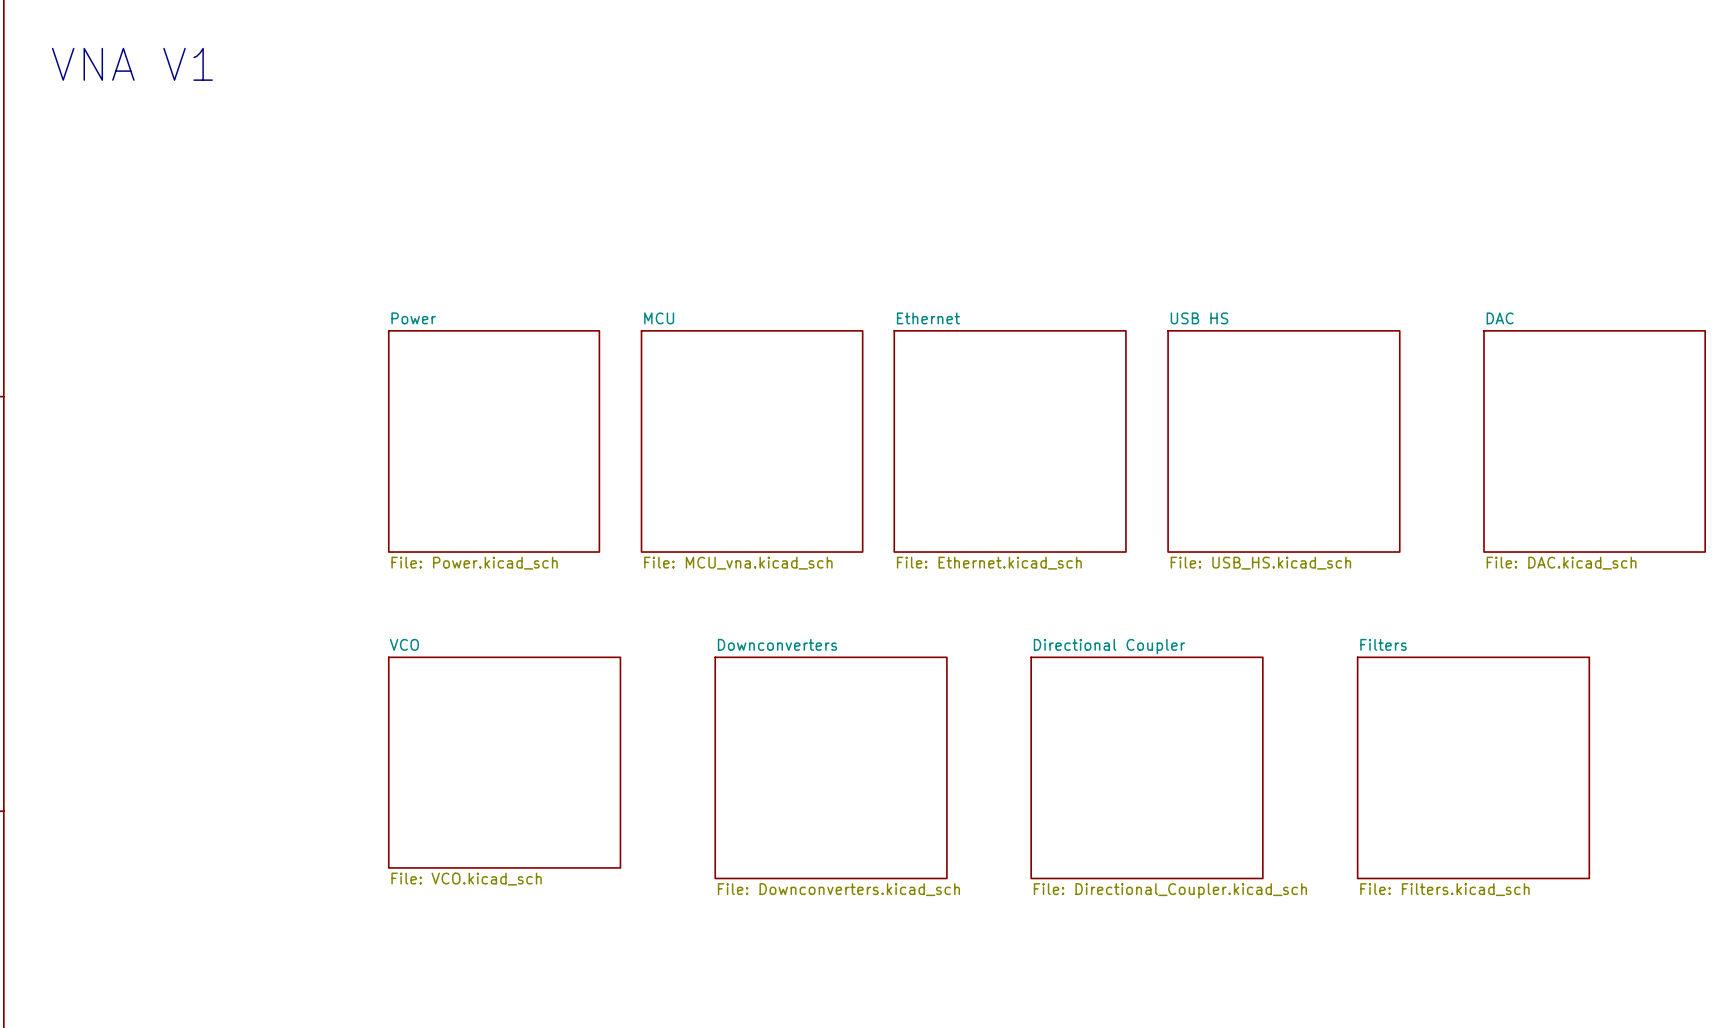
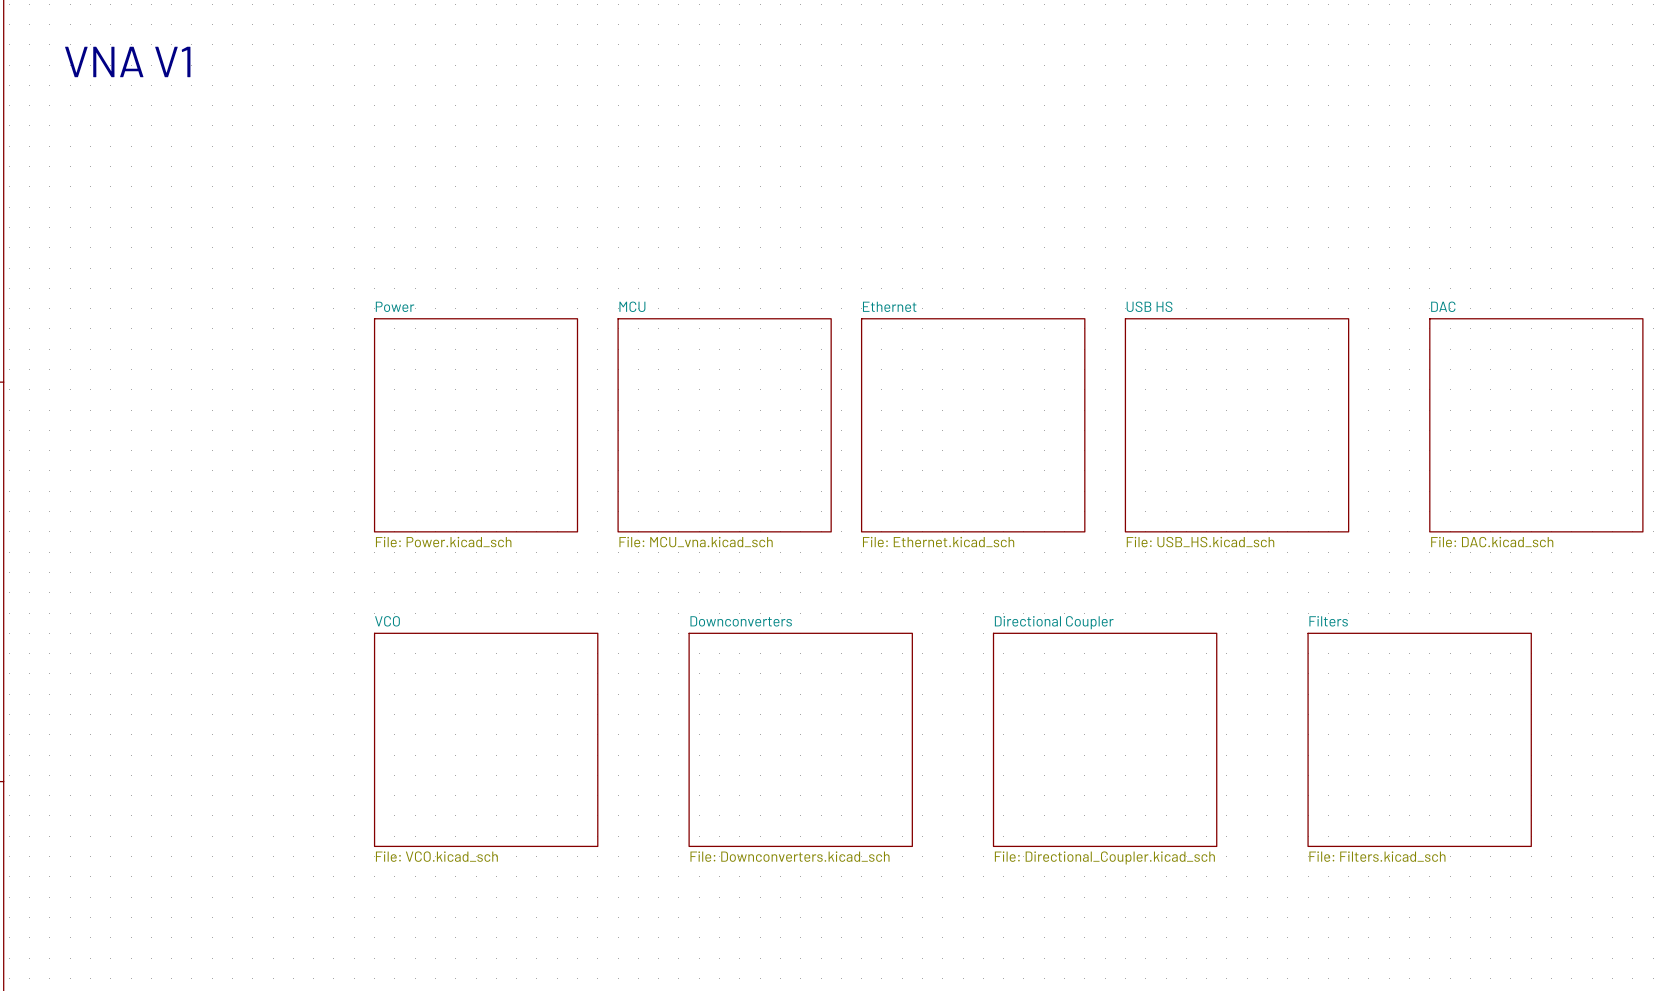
sheet VCO shape: [388, 656, 622, 869] -> [373, 632, 599, 848]

